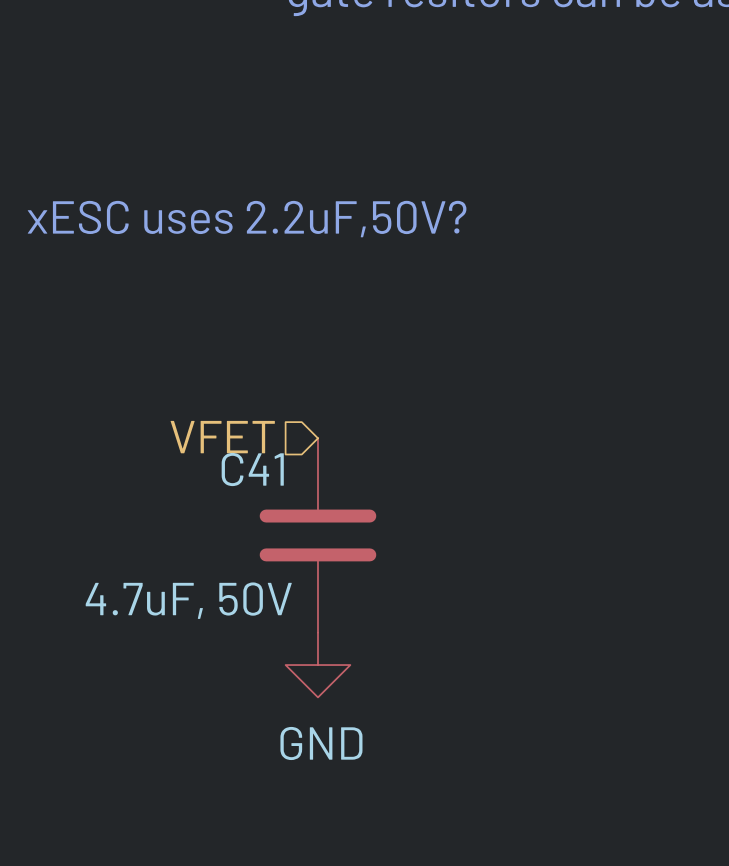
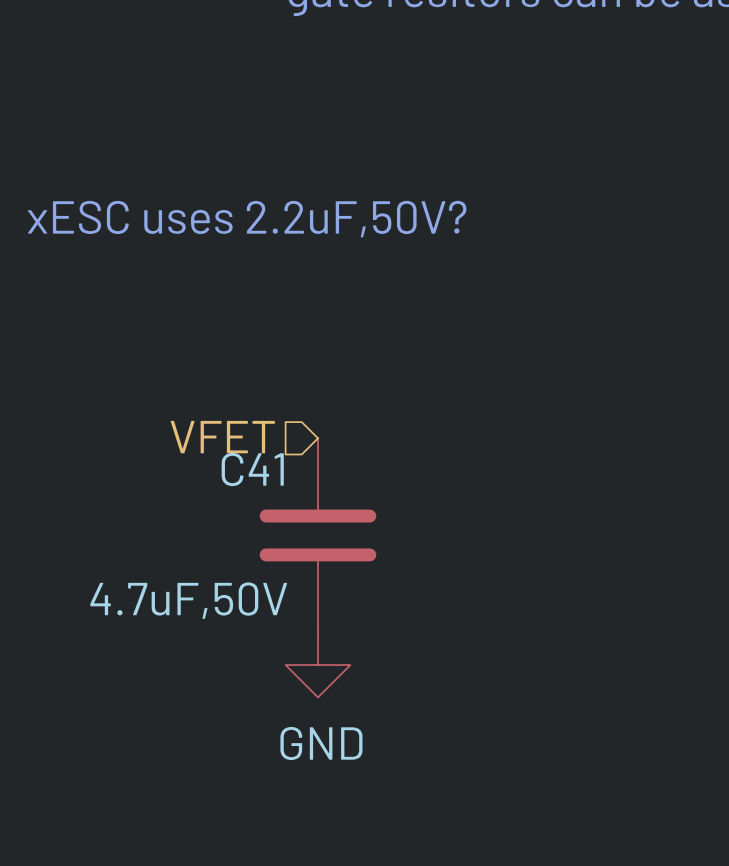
C41 value: 4.7uF, 50V (188, 600) -> 4.7uF,50V (188, 600)

